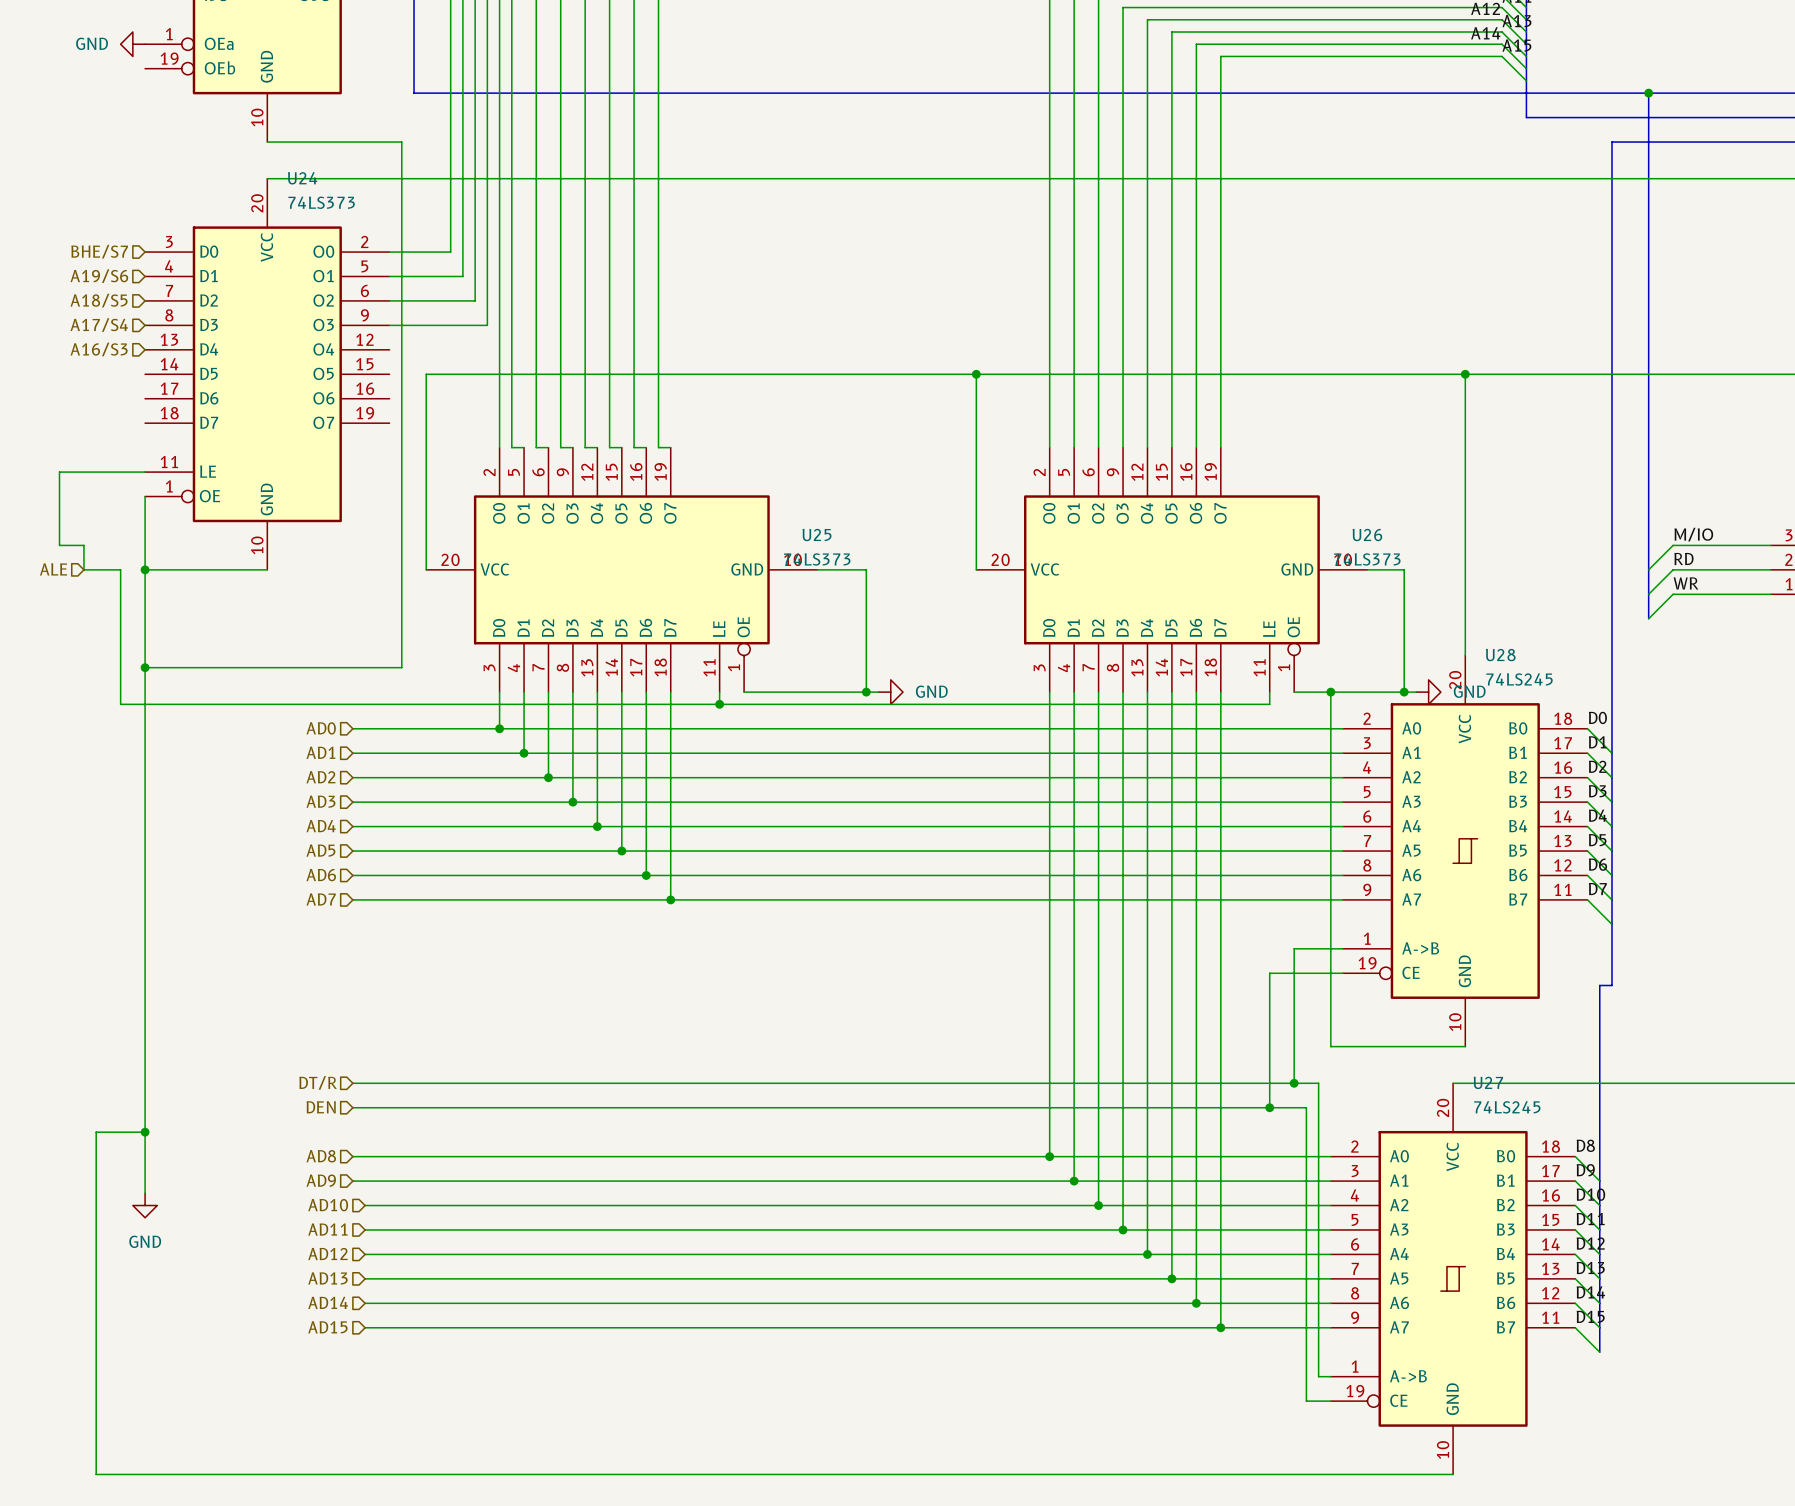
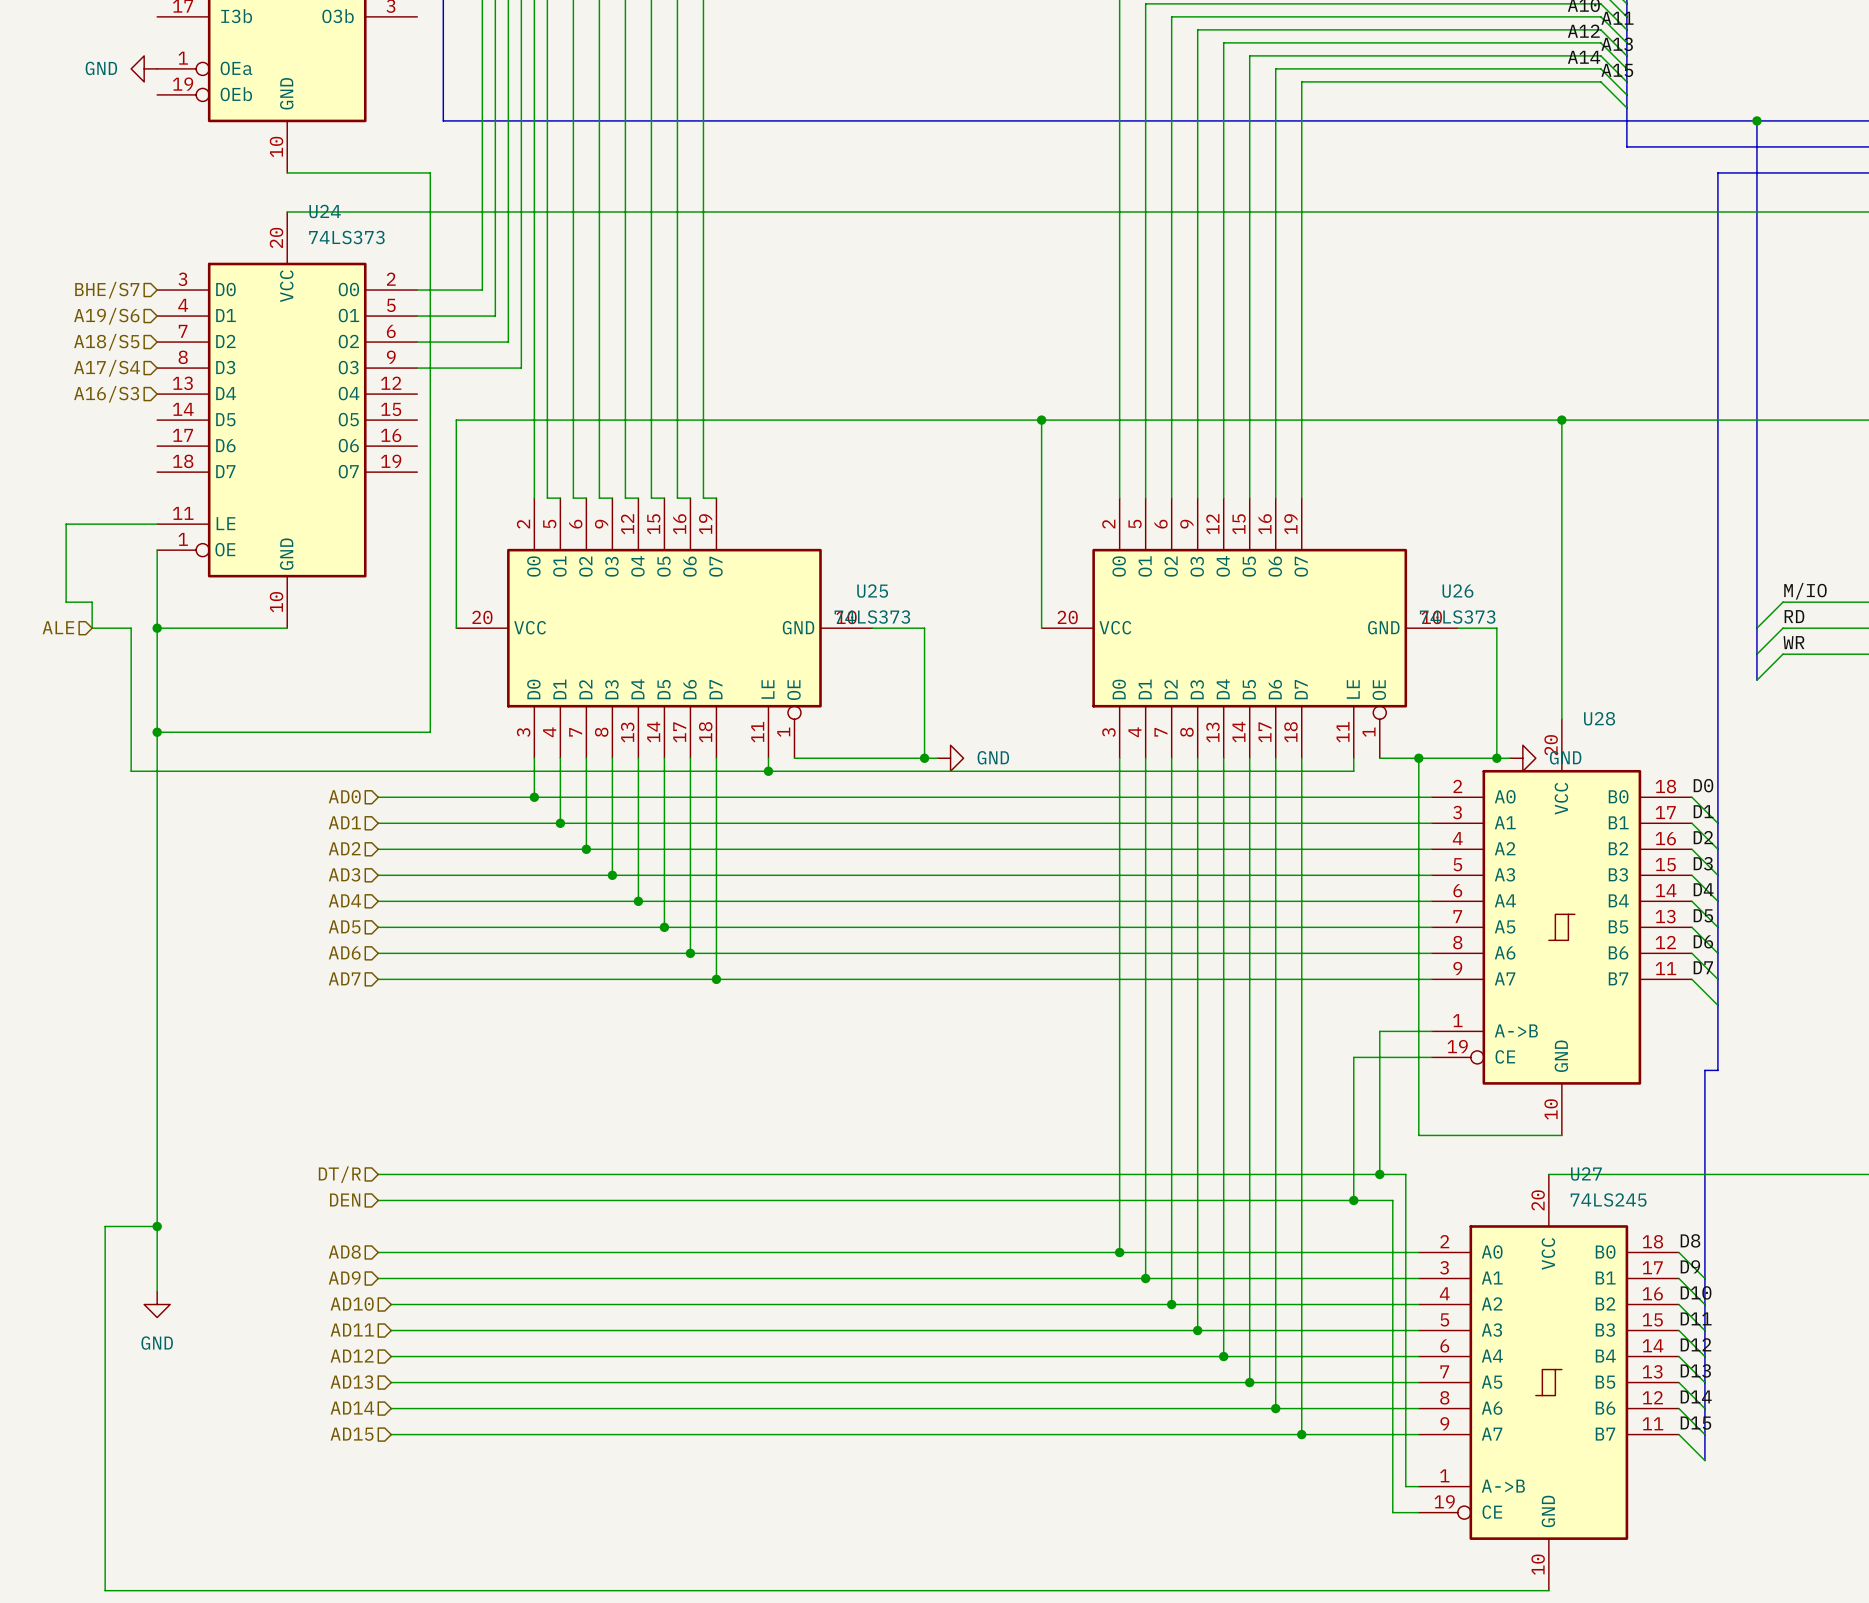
U28 value: 74LS245 (1519, 679) -> none

